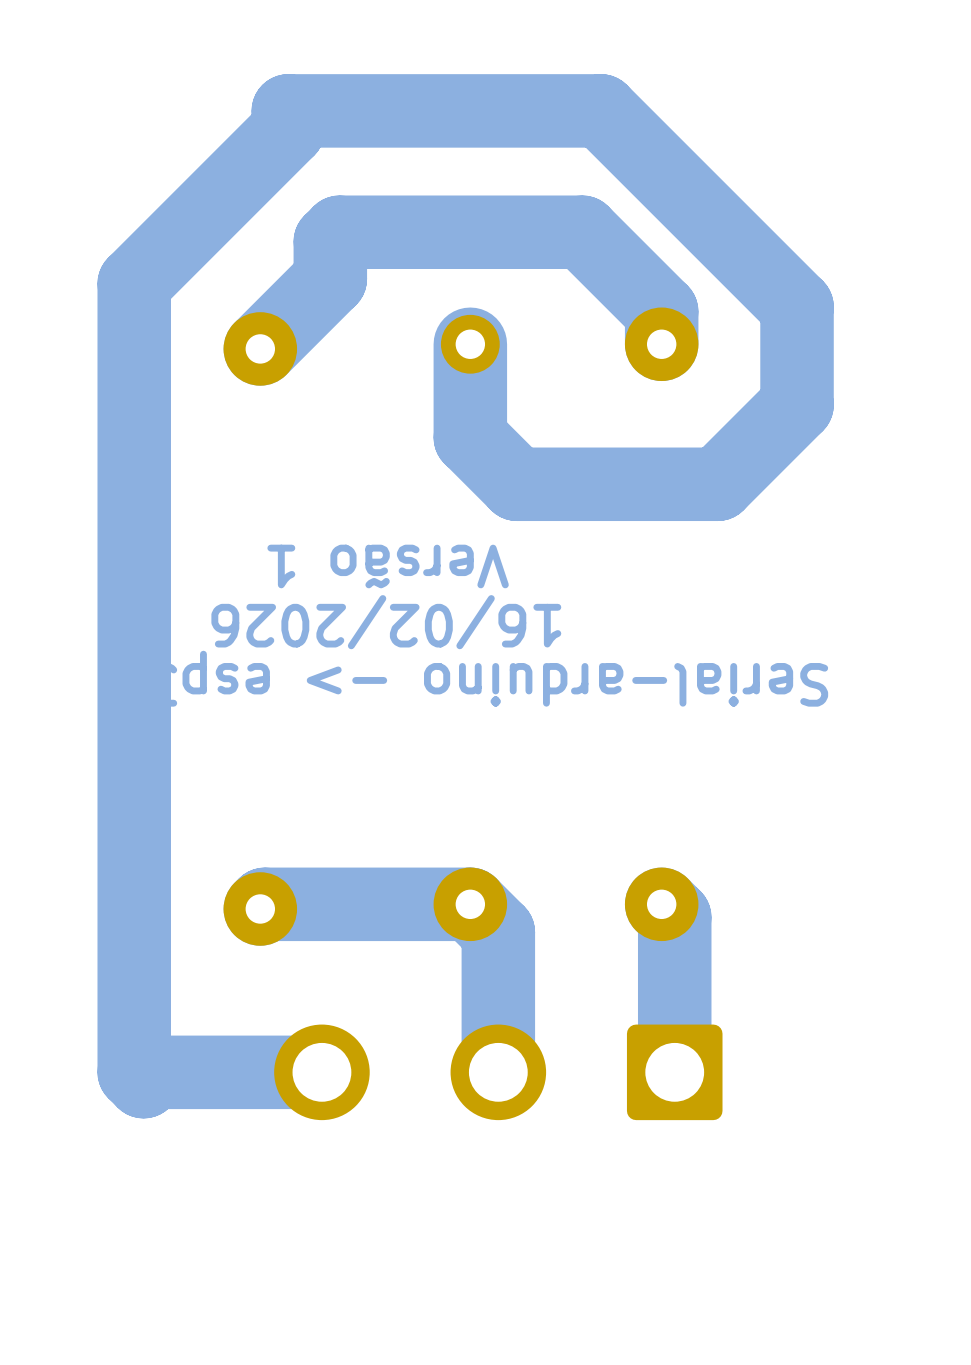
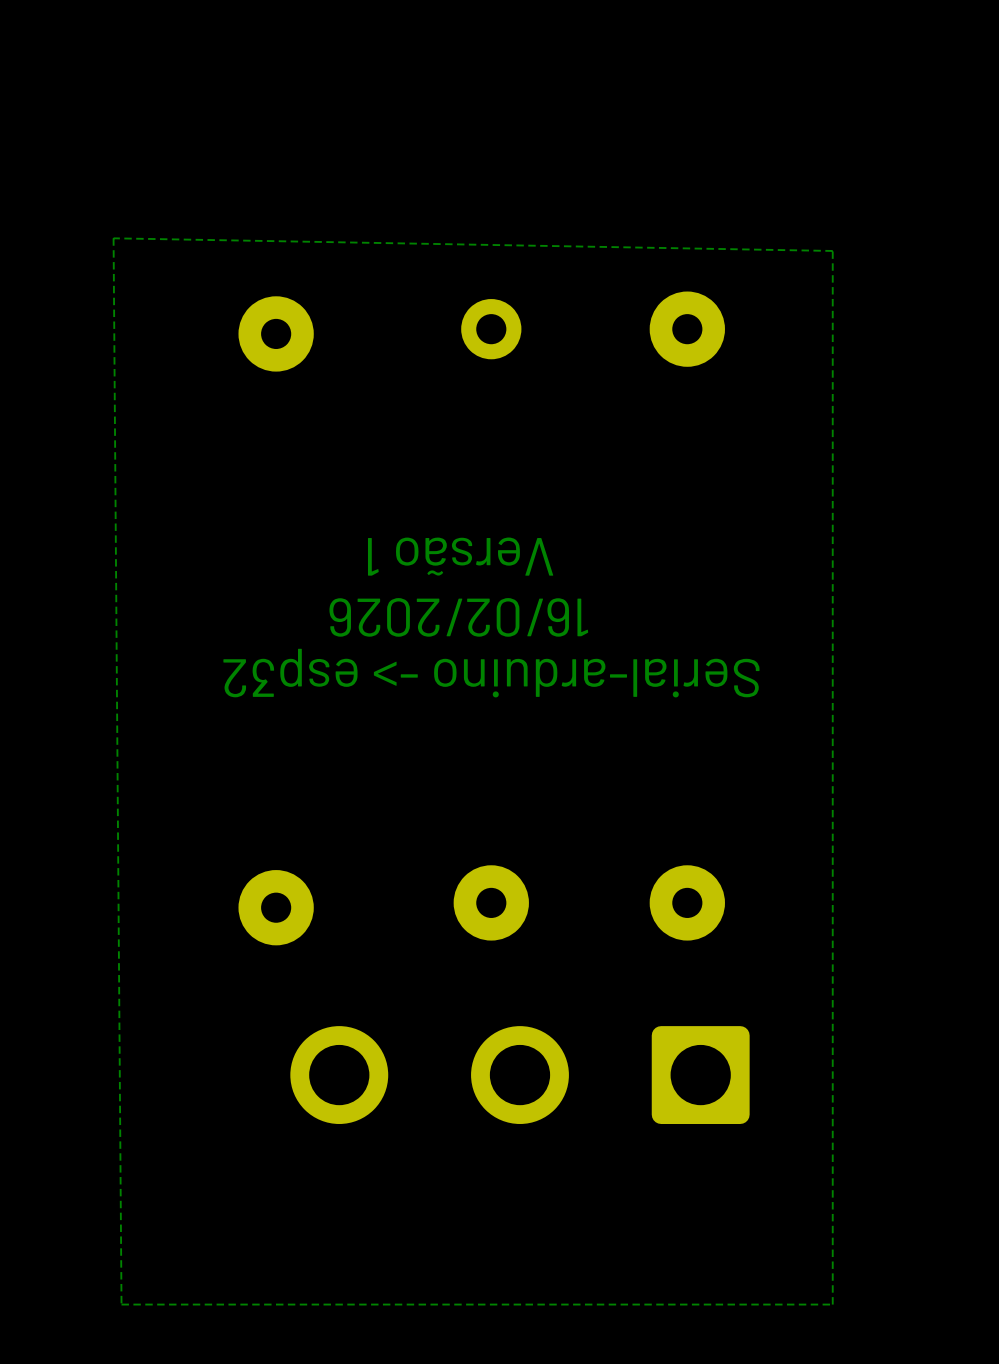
bottom zone outline: none -> (113, 238) (832, 250) (832, 1304) (121, 1304) (113, 238)
bottom track: (470, 344) (470, 437) (517, 484) (717, 484) (797, 404) (797, 306) (601, 110) (288, 110) (288, 129) (134, 283) (134, 1072) (143, 1081) (152, 1072) (321, 1072) -> none
bottom track: (661, 344) (661, 311) (582, 232) (339, 232) (330, 241) (330, 278) (260, 348) -> none
bottom track: (661, 904) (674, 917) (674, 1072) -> none
bottom track: (260, 908) (264, 904) (470, 904) (498, 932) (498, 1072) -> none

